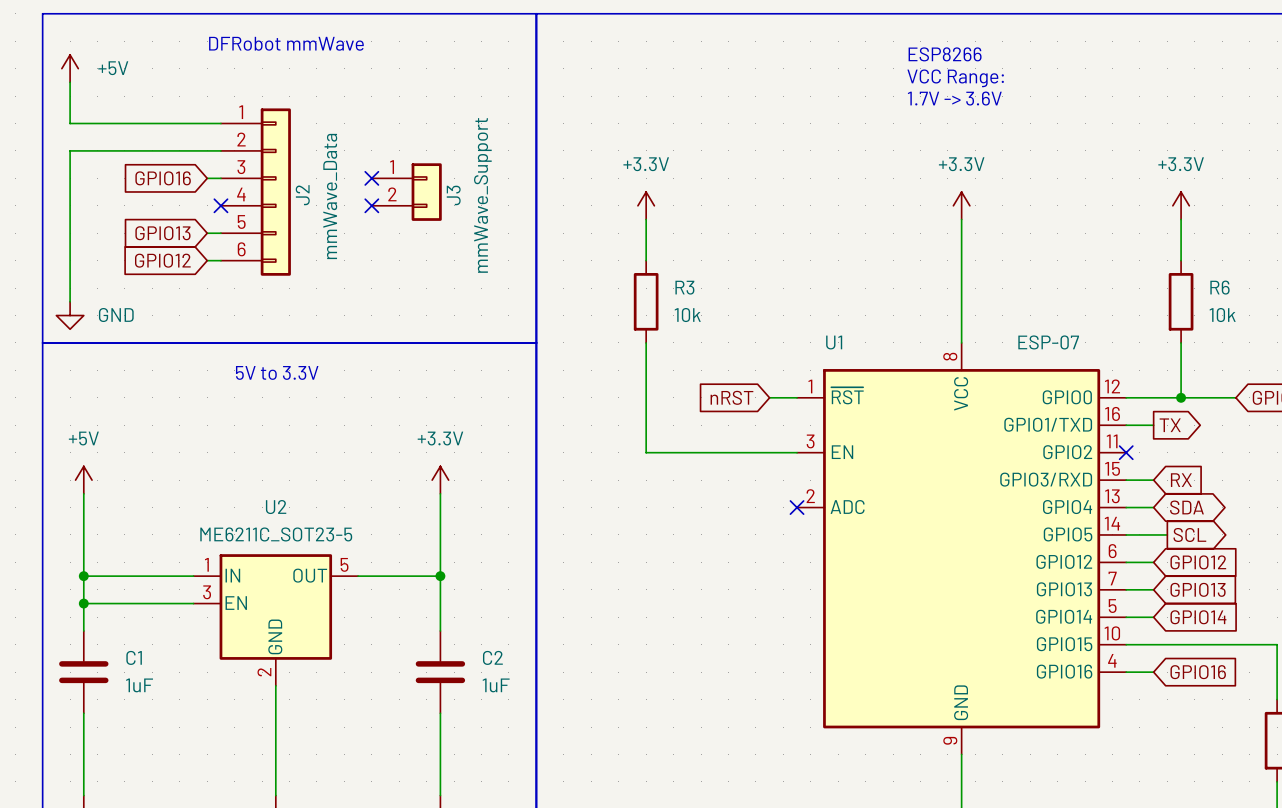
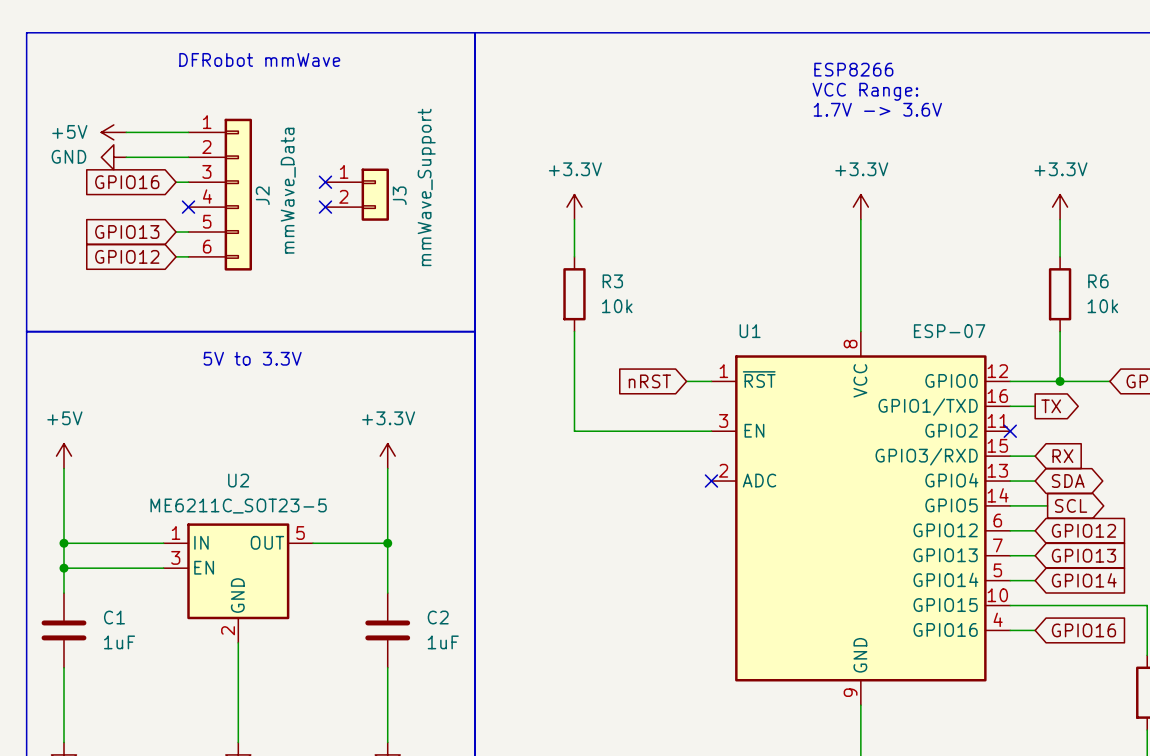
power symbol rotation: 0° (70, 68) -> 90° counterclockwise (113, 132)
power symbol position: +5V (70, 68) -> +5V (113, 132)
power symbol text position: +5V (113, 68) -> +5V (69, 131)
wire: (70, 82) (70, 123) (152, 123) -> none
wire: (152, 150) (70, 150) (70, 301) -> none
power symbol rotation: 0° (70, 315) -> 90° clockwise (113, 157)
power symbol position: GND (70, 315) -> GND (113, 157)
power symbol text position: GND (116, 315) -> GND (68, 156)

